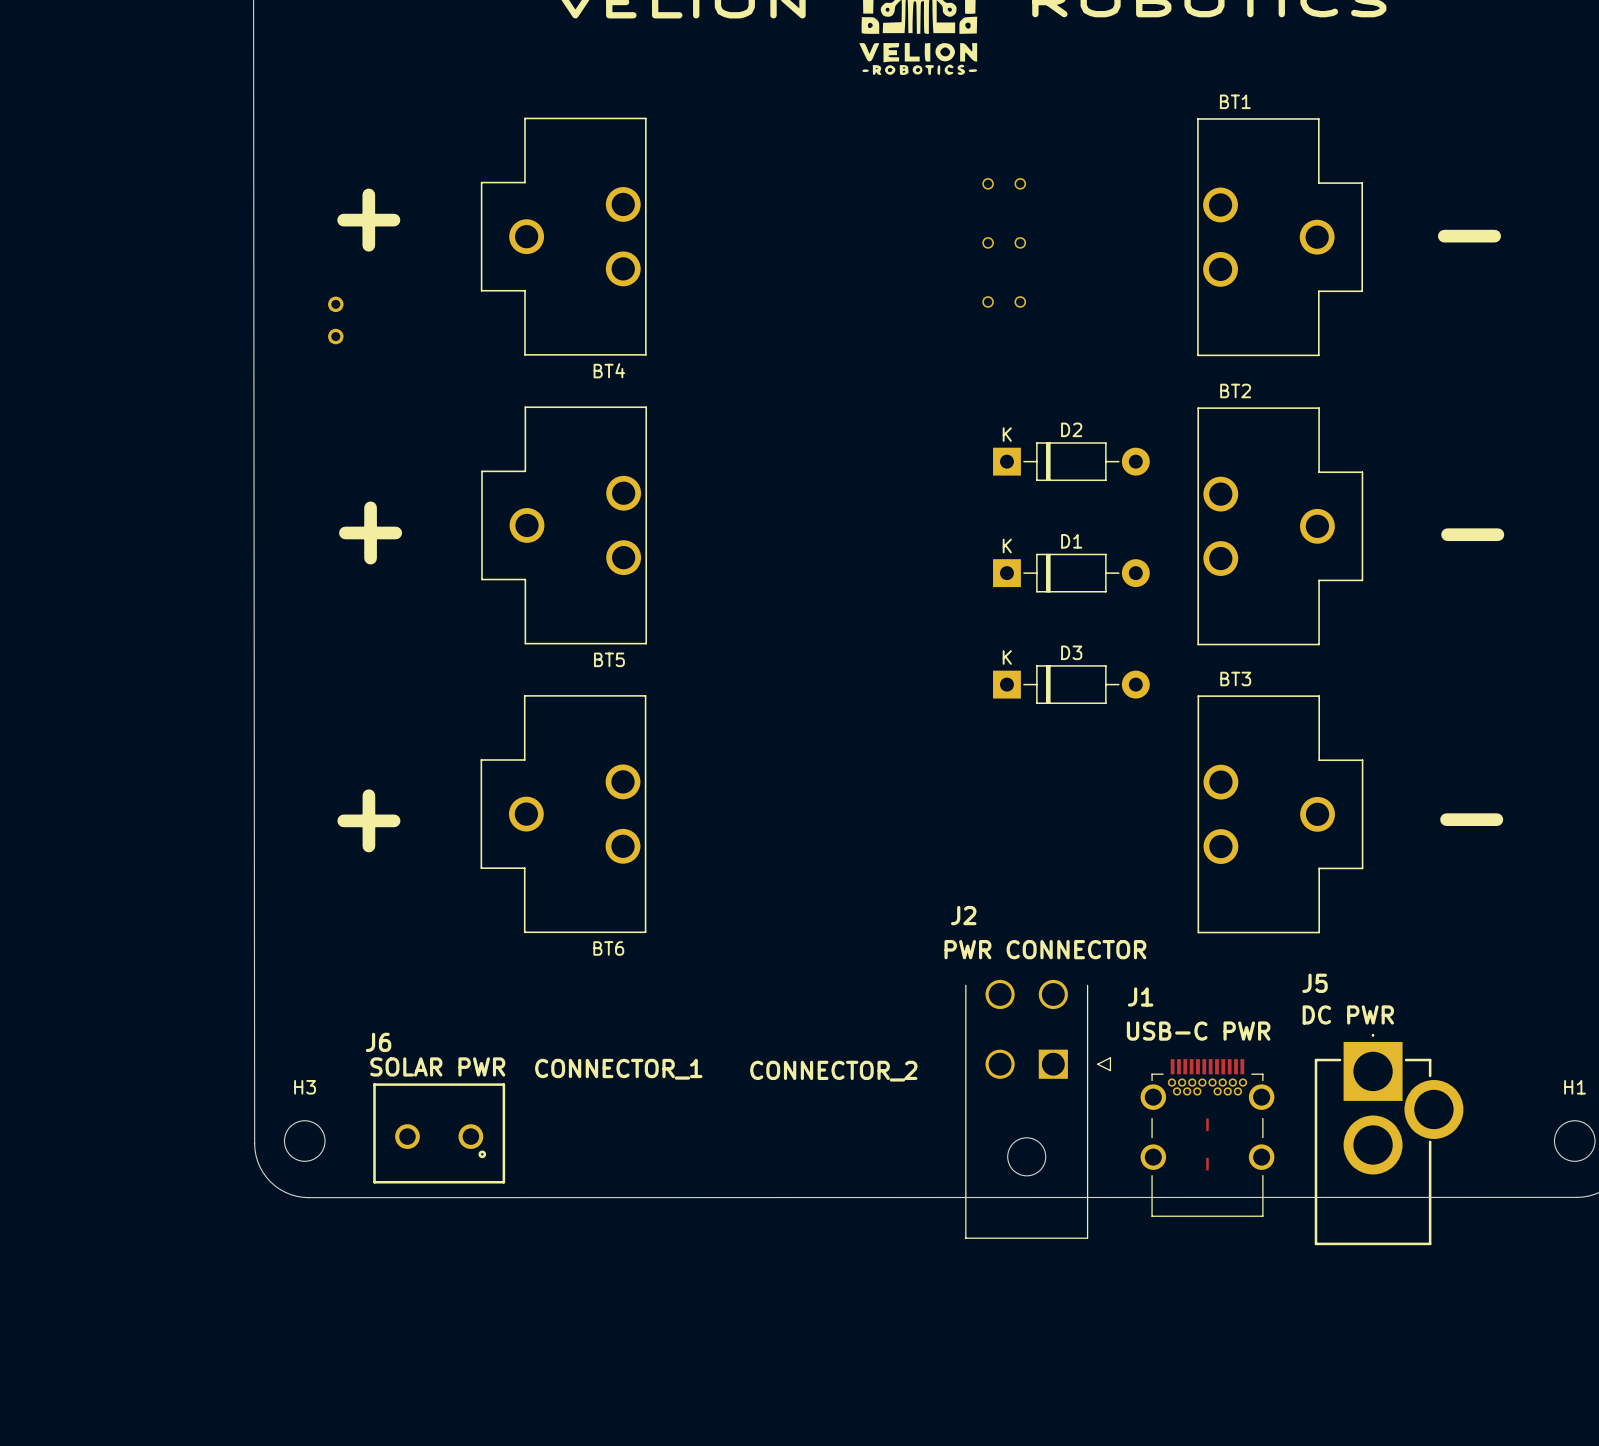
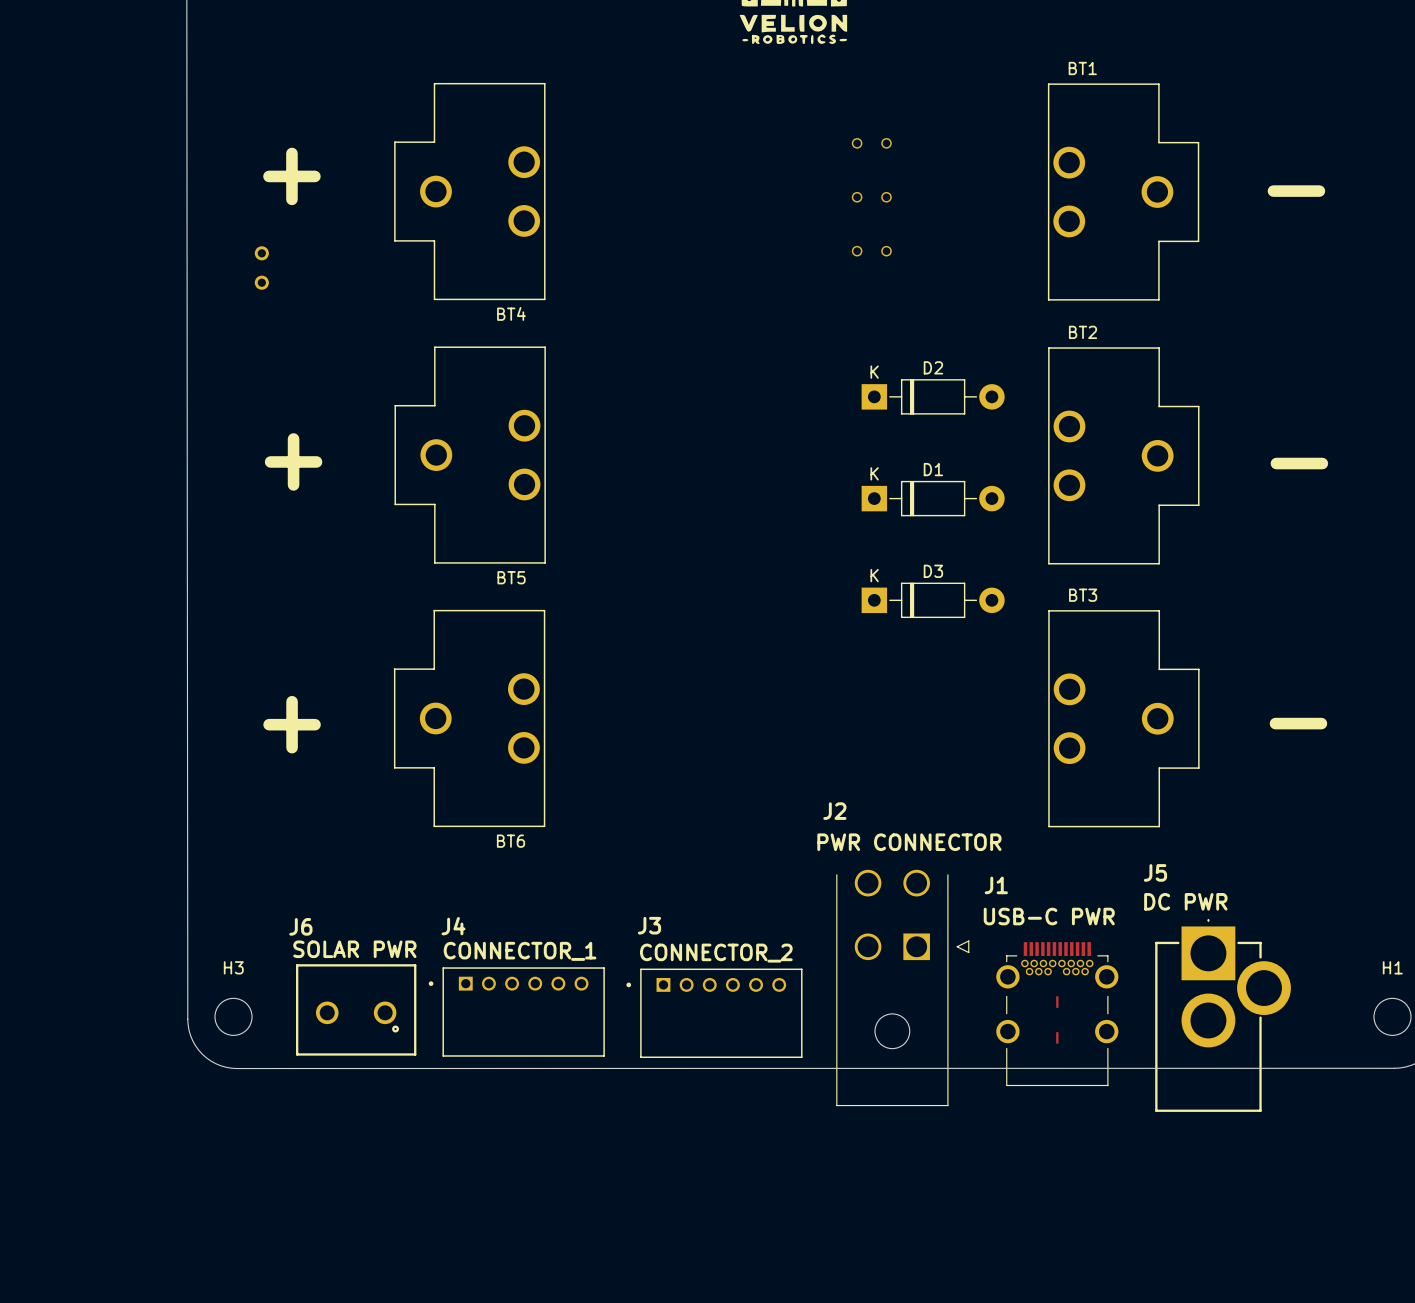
J4: none -> (516, 1012)
J3: none -> (714, 1013)

